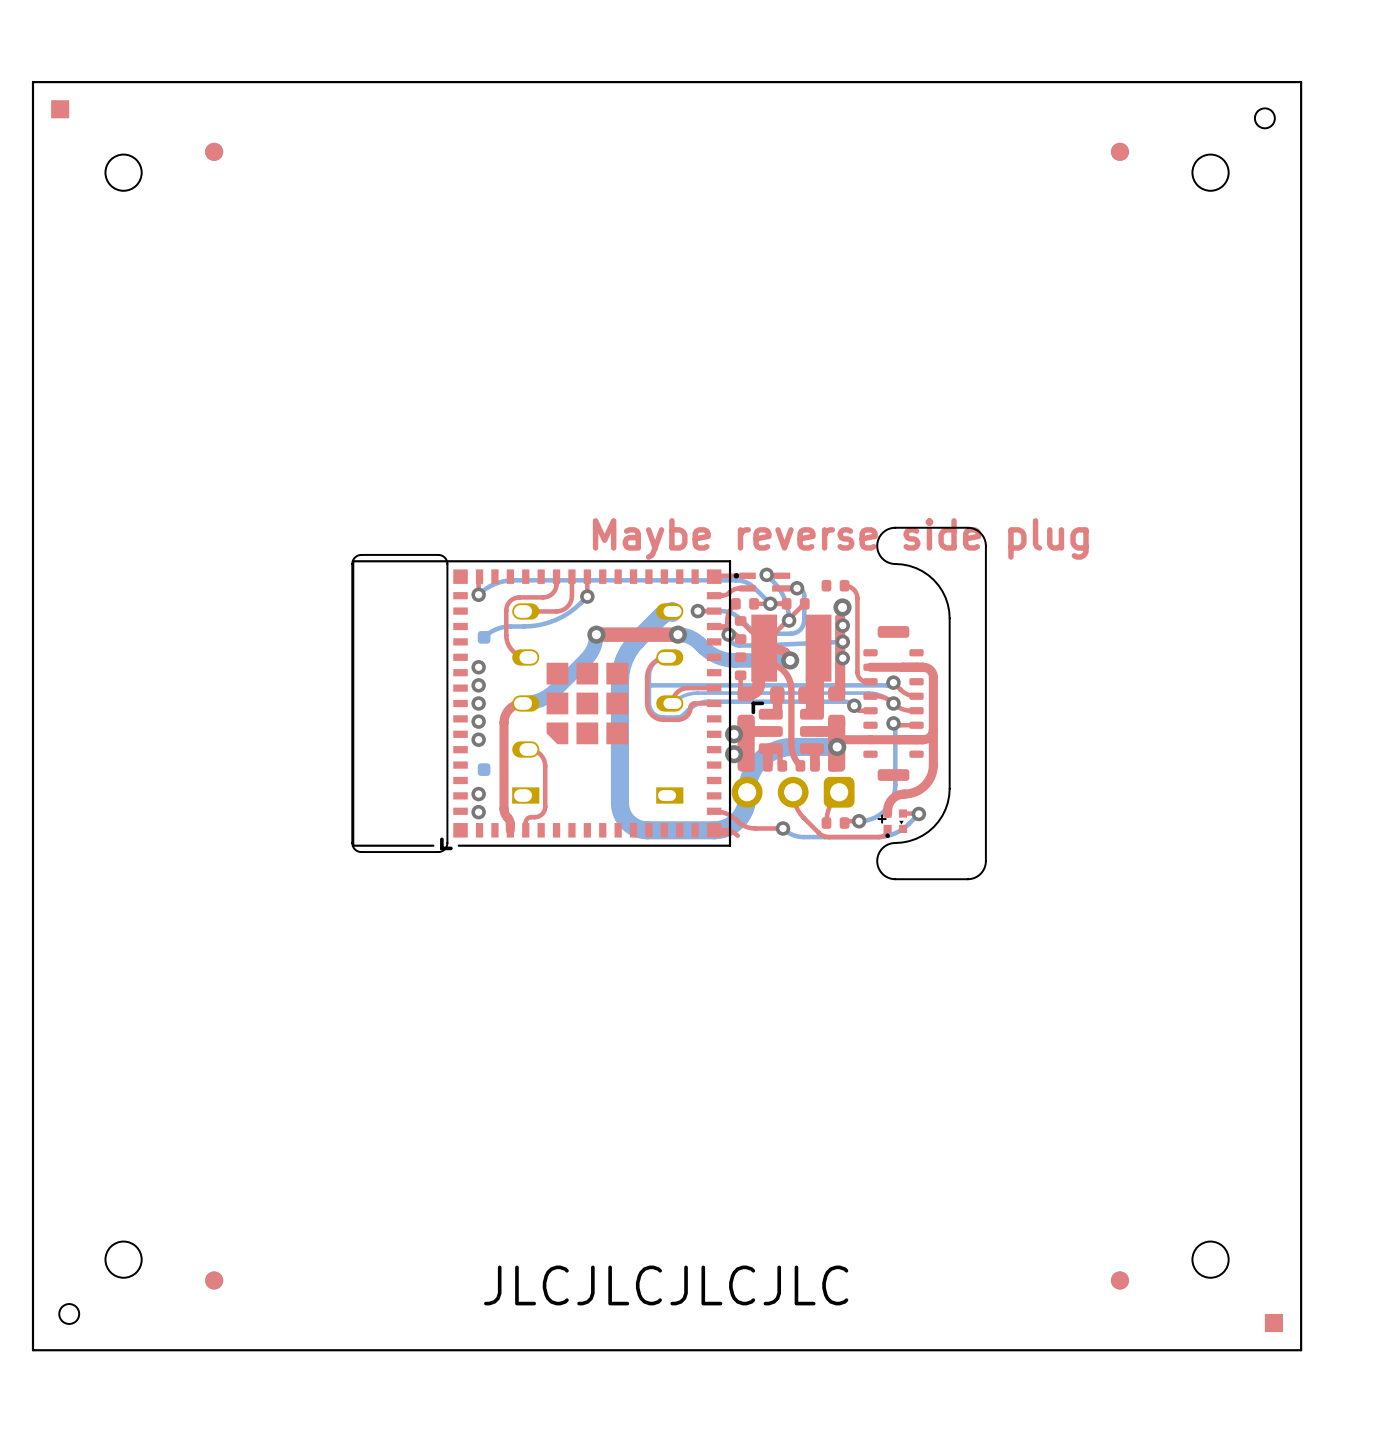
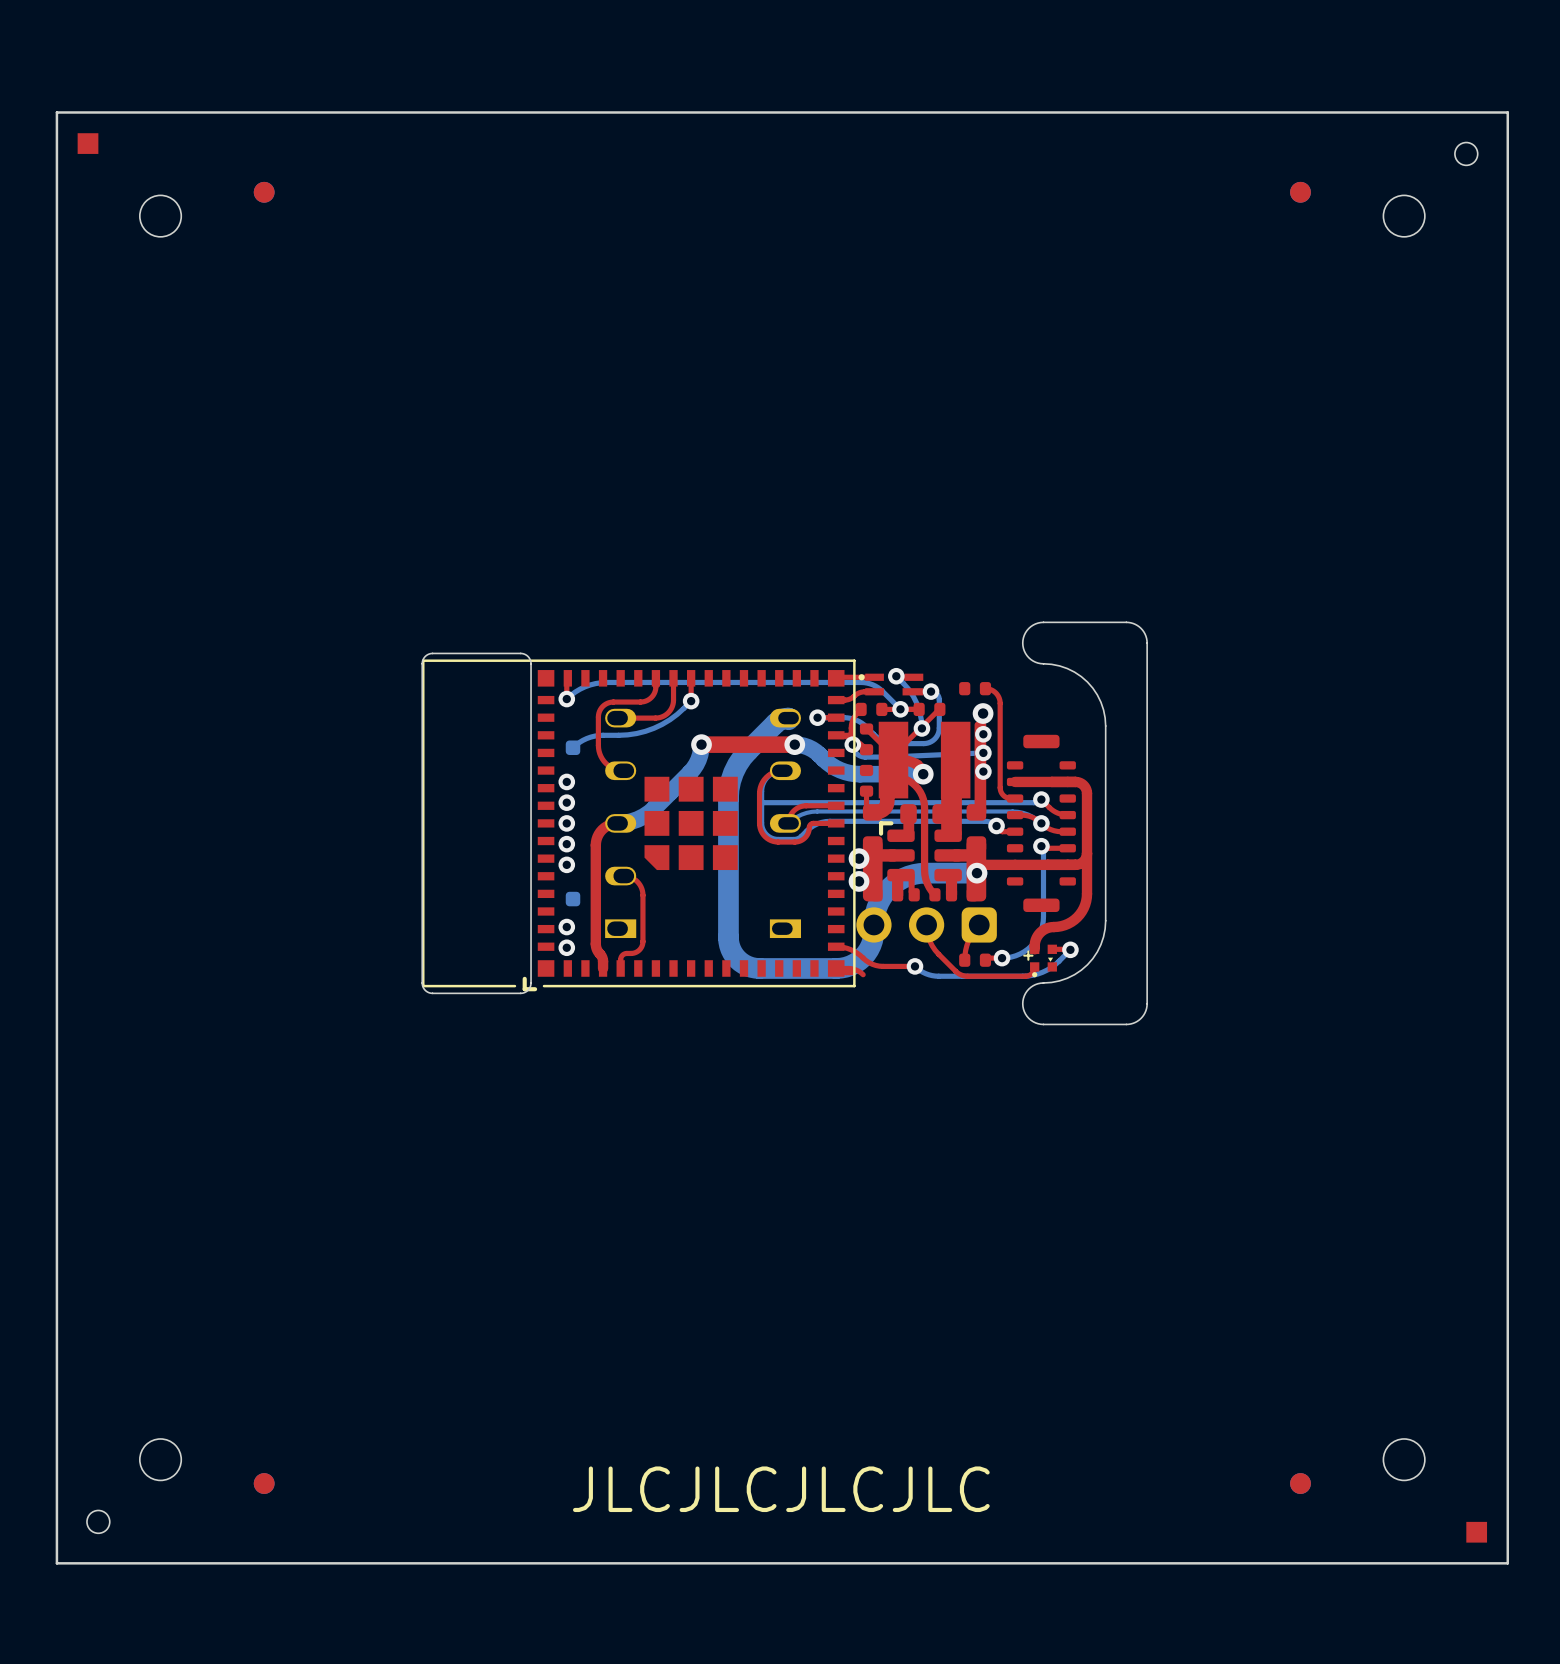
text: Maybe reverse side plug (840, 538) -> none

